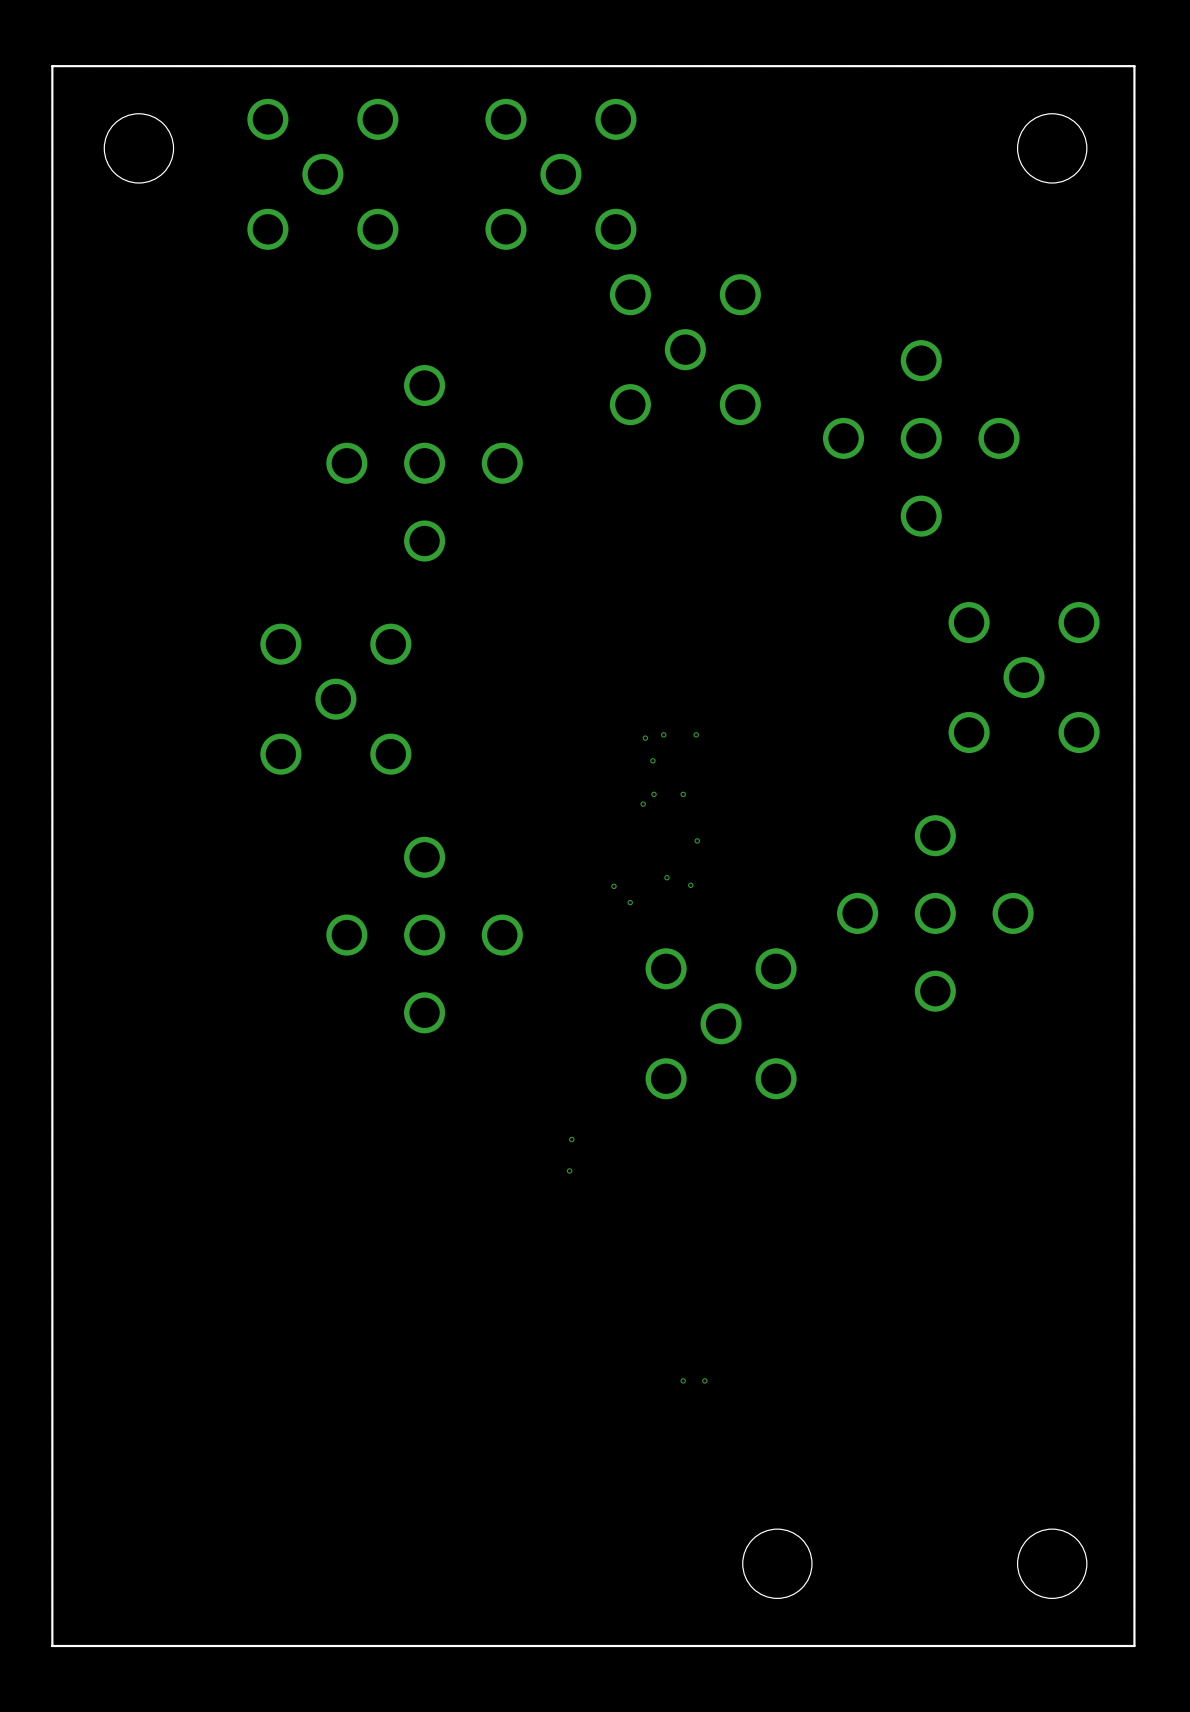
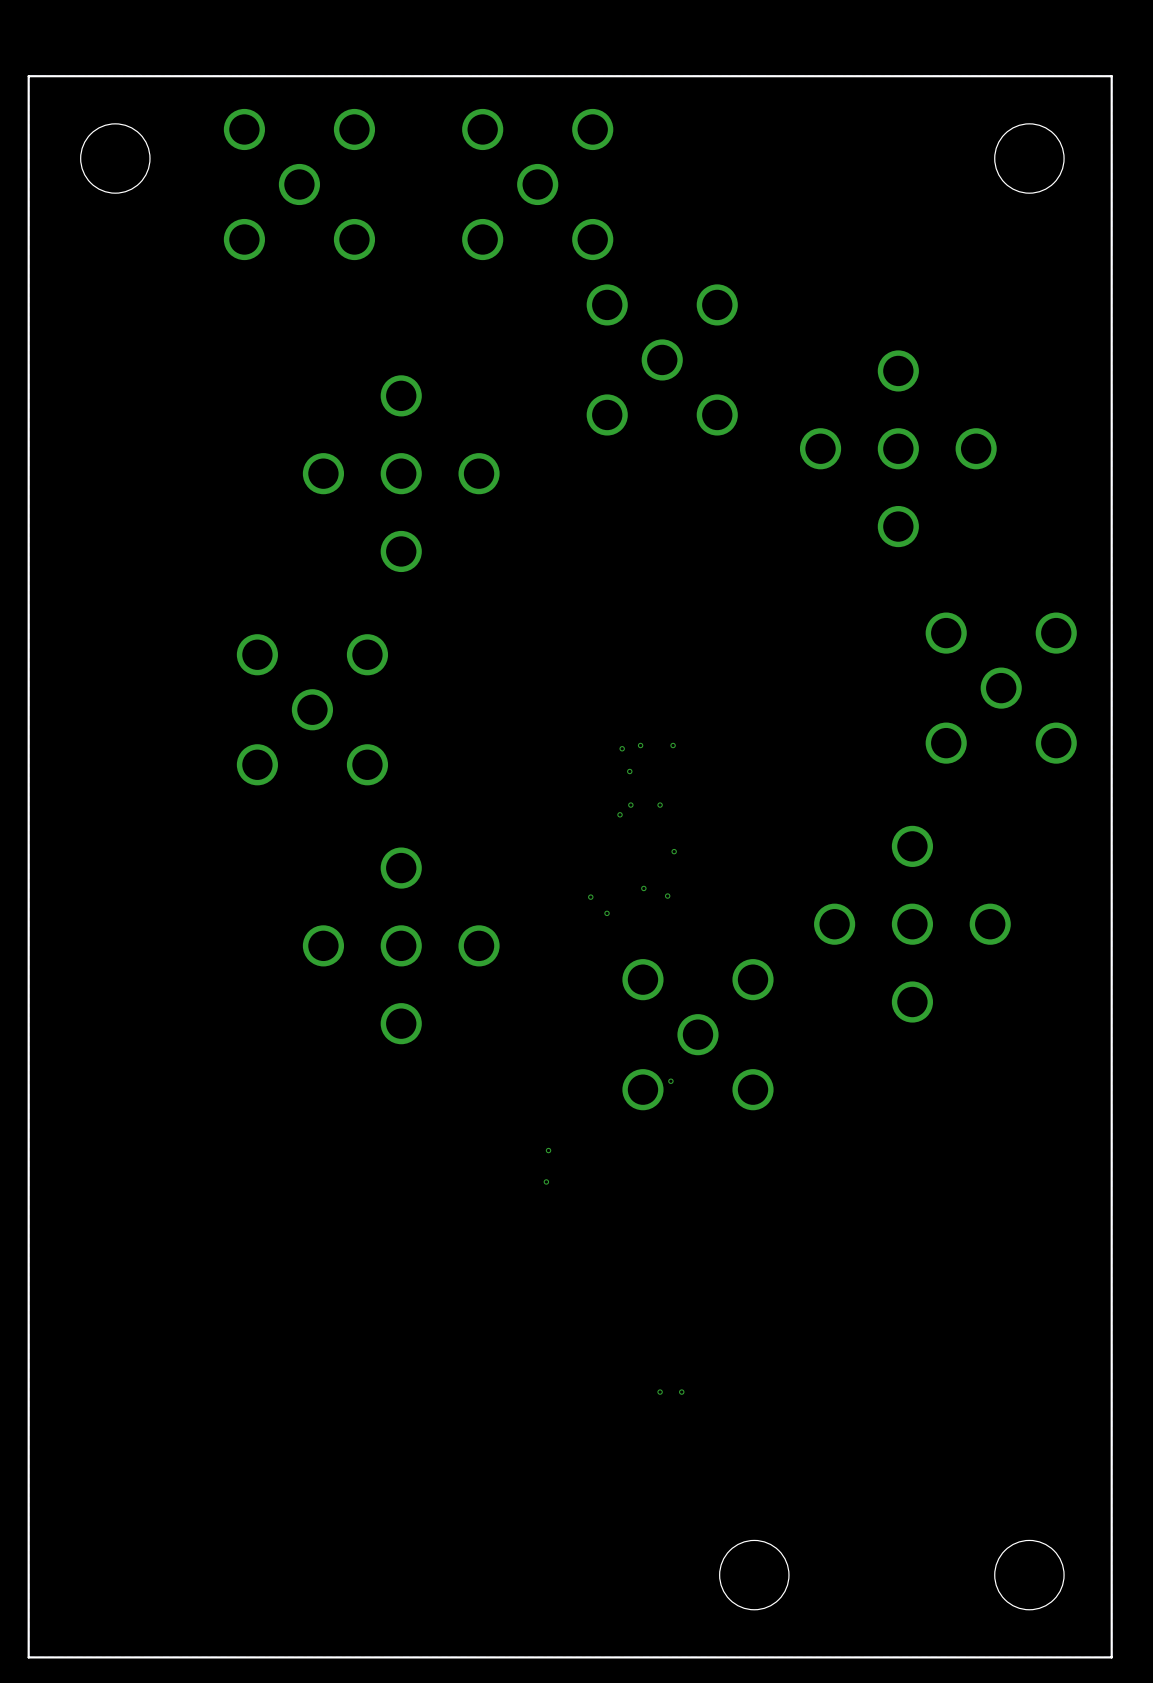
via: none -> (670, 1081)

